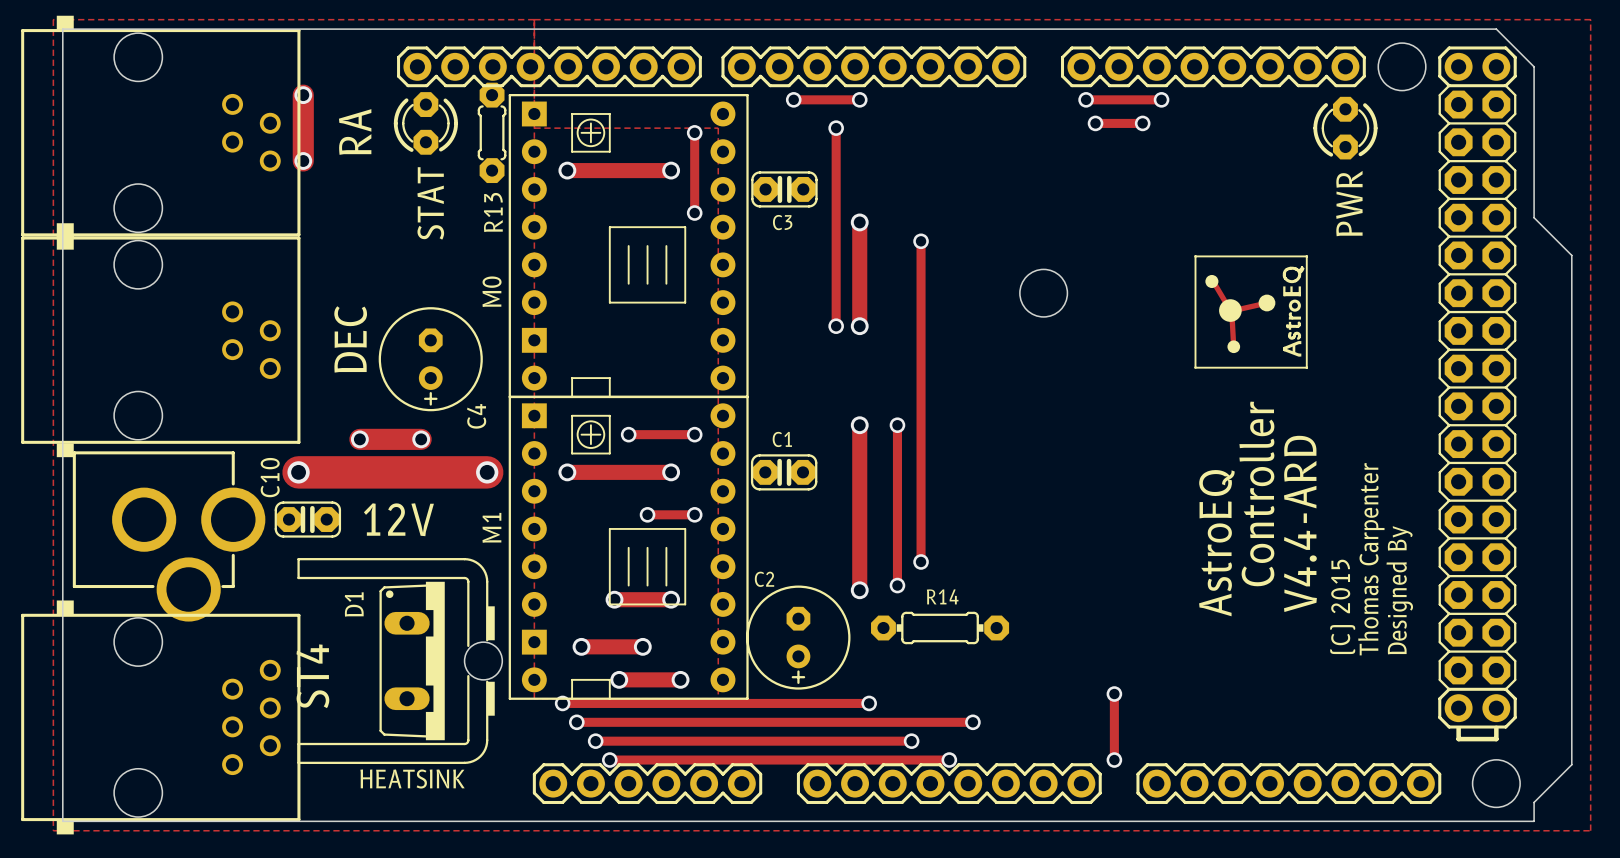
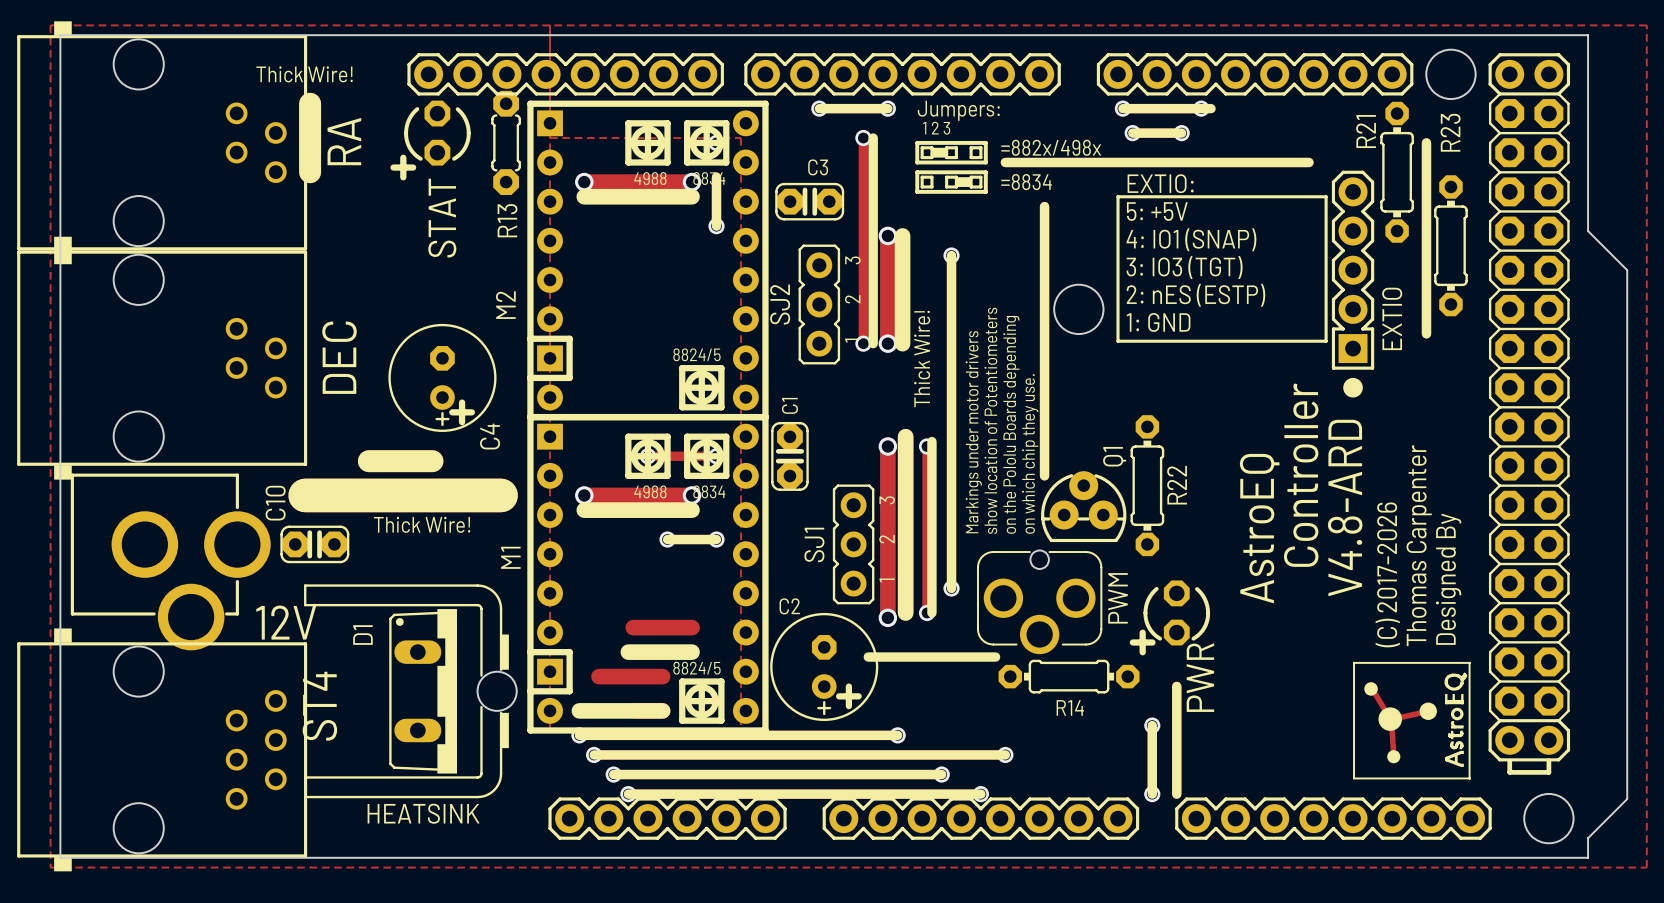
part footprint: [62, 29, 1572, 822] -> [60, 35, 1628, 858]
text: none -> Thick Wire! (304, 74)
STAT footprint: [393, 92, 458, 155] -> [404, 100, 471, 166]
line: none -> (310, 103) (310, 172)
line: none -> (819, 108) (887, 108)
line: none -> (1122, 108) (1211, 108)
text: none -> Jumpers: (958, 110)
text: none -> 1 2 3 (936, 128)
line: none -> (1132, 133) (1181, 133)
line: none -> (873, 138) (873, 343)
PWR: (1345, 128) -> none
RA name position: RA (355, 131) -> RA (344, 141)
track: (694, 132) (694, 165) -> none
line: none -> (917, 142) (917, 162) (985, 162) (985, 142) (917, 142)
line: none -> (1426, 142) (1426, 333)
line: none -> (922, 147) (922, 157) (931, 157) (931, 147) (922, 147)
drawing: none -> [931, 147, 947, 158]
line: none -> (946, 147) (946, 157) (956, 157) (956, 147) (946, 147)
line: none -> (971, 147) (971, 157) (980, 157) (980, 147) (971, 147)
text: none -> =882x/498x (1051, 147)
line: none -> (403, 157) (403, 177)
line: none -> (1005, 162) (1308, 162)
line: none -> (393, 167) (413, 167)
line: none -> (917, 172) (917, 191) (985, 191) (985, 172) (917, 172)
R21: none -> (1397, 172)
line: none -> (716, 177) (716, 226)
line: none -> (922, 177) (922, 186) (931, 186) (931, 177) (922, 177)
line: none -> (946, 177) (956, 177) (956, 186) (946, 186) (946, 177)
drawing: none -> [956, 177, 972, 187]
line: none -> (971, 177) (980, 177) (980, 186) (971, 186) (971, 177)
text: none -> =8834 (1026, 182)
text: none -> EXTIO: (1160, 183)
line: none -> (584, 196) (692, 196)
line: none -> (1118, 196) (1118, 341) (1326, 341) (1326, 196) (1118, 196)
line: none -> (1044, 206) (1044, 475)
text: none -> 5: +5V (1157, 211)
C3 name position: C3 (782, 222) -> C3 (818, 167)
line: none -> (902, 235) (902, 343)
text: none -> 4: IO1 (SNAP) (1191, 239)
R23: none -> (1450, 245)
line: none -> (951, 255) (951, 588)
M0: (628, 246) -> none
M2: none -> (647, 260)
text: none -> 3: IO3 (TGT) (1184, 267)
drawing: [1194, 255, 1308, 369] -> none
EXTIO: none -> (1353, 284)
text: none -> 2: nES (ESTP) (1195, 295)
SJ2: none -> (819, 304)
text: none -> 1: GND (1158, 322)
DEC name position: DEC (350, 339) -> DEC (339, 357)
text: none -> Thick Wire! (922, 358)
line: none -> (462, 402) (462, 422)
line: none -> (452, 412) (471, 412)
M1 footprint: [508, 395, 749, 700] -> [527, 413, 769, 734]
text: none -> show location of Potentiometers (990, 420)
text: none -> on the Pololu Boards depending (1011, 424)
text: none -> Markings under motor drivers (973, 432)
line: none -> (905, 436) (905, 612)
line: none -> (931, 441) (931, 612)
text: none -> on which chip they use. (1030, 453)
line: none -> (368, 461) (432, 461)
R22: none -> (1147, 485)
line: none -> (305, 495) (501, 495)
C1 rotation: 0° (784, 472) -> 90° counterclockwise (789, 456)
C1 position: (784, 472) -> (789, 456)
Q1: none -> (1083, 506)
line: none -> (584, 510) (692, 510)
text position: Controller (1256, 493) -> Controller (1301, 475)
text: none -> Thick Wire! (422, 524)
line: none -> (667, 539) (716, 539)
text position: 12V (398, 519) -> 12V (286, 622)
SJ1: none -> (853, 544)
text: V4.4-ARD (1300, 523) -> V4.8-ARD (1345, 507)
text position: AstroEQ (1216, 543) -> AstroEQ (1259, 528)
text position: Thomas Carpenter (1371, 559) -> Thomas Carpenter (1419, 545)
PWM: none -> (1039, 602)
PWR: none -> (1176, 612)
text position: Designed By (1399, 590) -> Designed By (1448, 579)
R14 name position: R14 (942, 596) -> R14 (1070, 707)
via: (614, 599) -> none
via: (671, 599) -> none
line: none -> (1142, 632) (1142, 652)
text: (C) 2015 (1342, 606) -> (C) 2017-2026 (1387, 574)
R14 footprint: [871, 611, 1010, 645] -> [998, 659, 1140, 694]
line: none -> (1132, 642) (1152, 642)
line: none -> (628, 652) (692, 652)
line: none -> (868, 657) (995, 657)
drawing: none -> [1353, 661, 1471, 780]
via: (581, 646) -> none
via: (642, 646) -> none
line: none -> (848, 686) (848, 706)
line: none -> (1176, 686) (1176, 794)
line: none -> (839, 696) (858, 696)
line: none -> (579, 710) (662, 710)
via: (619, 679) -> none
track: (642, 679) (680, 679) -> none
via: (680, 679) -> none
line: none -> (1152, 725) (1152, 794)
line: none -> (579, 735) (897, 735)
line: none -> (594, 754) (1005, 754)
line: none -> (613, 774) (941, 774)
line: none -> (628, 794) (980, 794)

